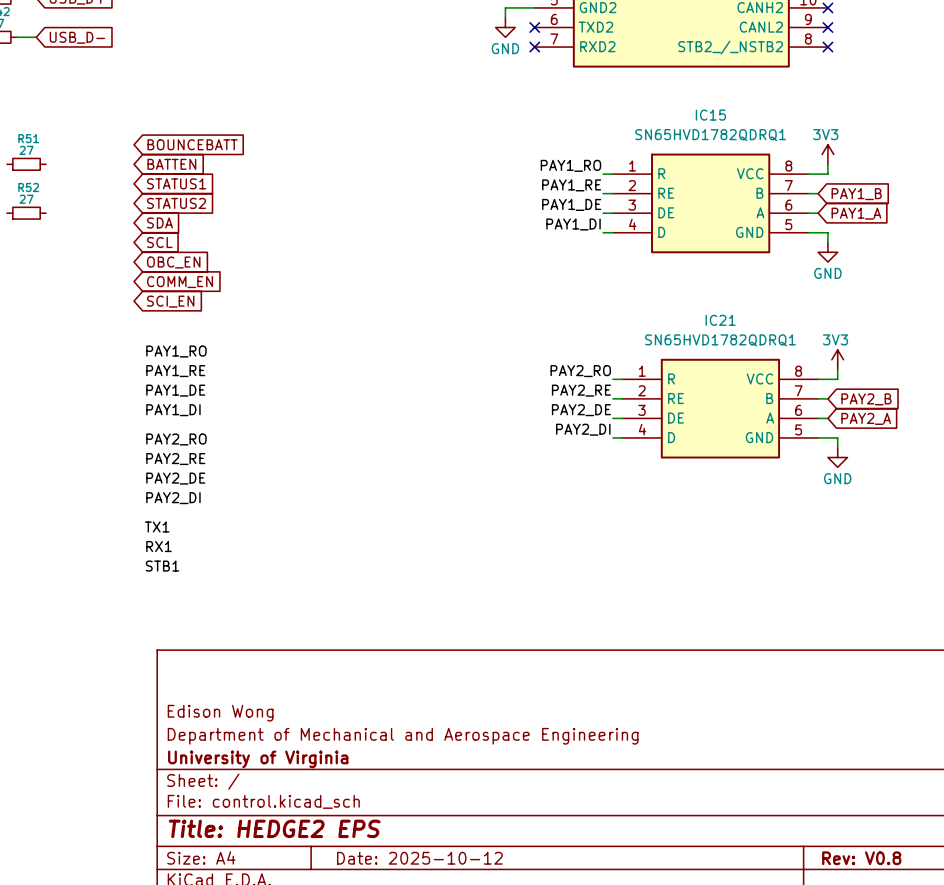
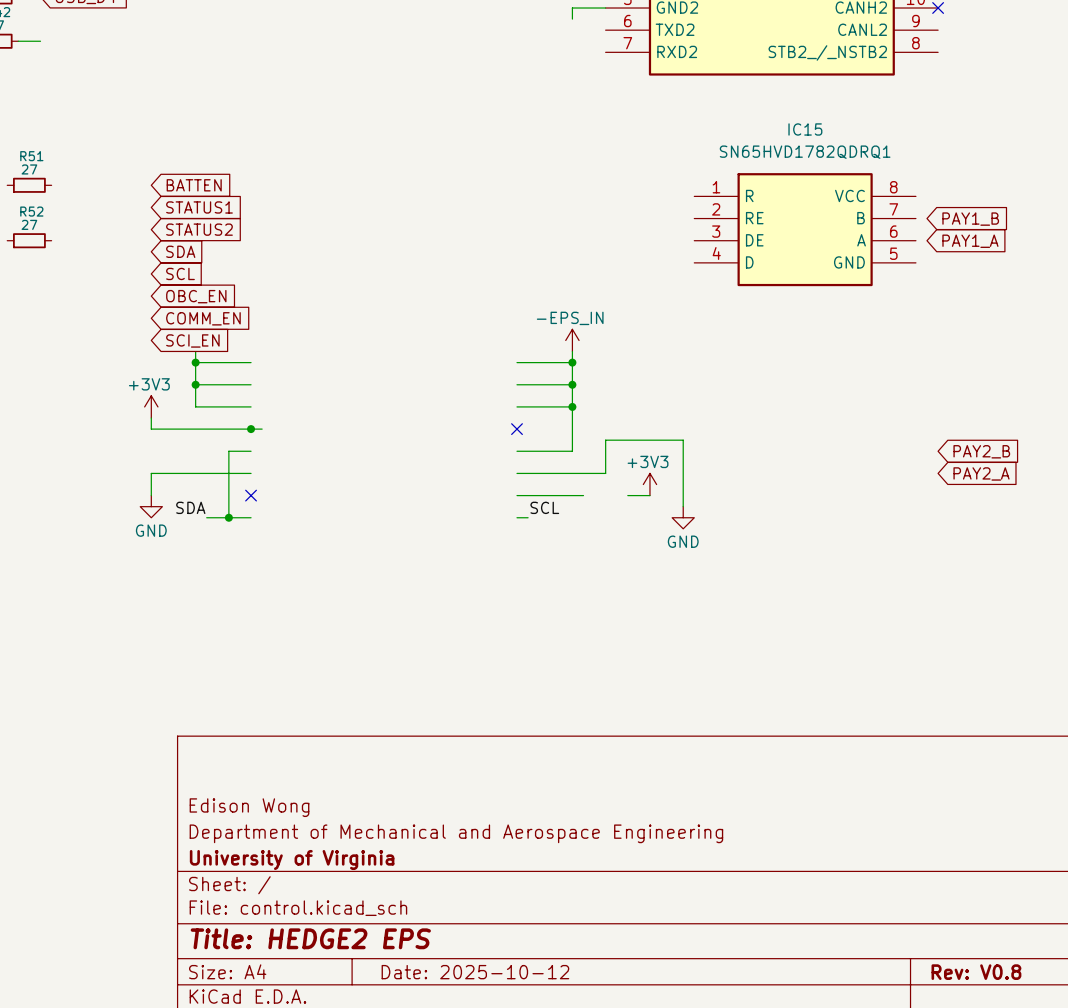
power symbol: GND (505, 27) -> none
no-connect mark: (534, 27) -> none
no-connect mark: (827, 27) -> none
global label: USB_D- (77, 37) -> none
no-connect mark: (534, 47) -> none
no-connect mark: (827, 47) -> none
global label: BOUNCEBATT (192, 144) -> none
power symbol: 3V3 (827, 154) -> none
wire: (827, 164) (827, 174) (808, 174) -> none
label: PAY1_RO (570, 165) -> none
wire: (603, 174) (612, 174) -> none
label: PAY1_RE (571, 185) -> none
wire: (603, 193) (612, 193) -> none
wire: (808, 193) (818, 193) -> none
label: PAY1_DE (571, 204) -> none
wire: (603, 213) (612, 213) -> none
wire: (808, 213) (818, 213) -> none
label: PAY1_DI (573, 224) -> none
wire: (603, 232) (612, 232) -> none
wire: (808, 232) (827, 232) (827, 242) -> none
power symbol: GND (827, 252) -> none
power symbol: none -> -EPS_IN (572, 340)
wire: none -> (195, 351) (195, 406) (251, 406)
wire: none -> (572, 351) (572, 451) (517, 451)
wire: none -> (195, 362) (251, 362)
junction: none -> (195, 362)
wire: none -> (517, 362) (572, 362)
junction: none -> (572, 362)
wire: none -> (195, 384) (251, 384)
junction: none -> (195, 384)
wire: none -> (517, 384) (572, 384)
junction: none -> (572, 384)
label: PAY1_RO (176, 351) -> none
power symbol: none -> +3V3 (151, 406)
wire: none -> (517, 406) (572, 406)
junction: none -> (572, 406)
power symbol: 3V3 (837, 359) -> none
wire: none -> (151, 418) (151, 429) (262, 429)
wire: (837, 369) (837, 379) (818, 379) -> none
label: PAY1_RE (175, 371) -> none
label: PAY2_RO (580, 371) -> none
junction: none -> (251, 429)
no-connect mark: none -> (517, 429)
wire: (612, 379) (622, 379) -> none
label: PAY1_DE (175, 390) -> none
label: PAY2_RE (581, 390) -> none
wire: none -> (251, 451) (228, 451) (228, 517)
wire: (612, 398) (622, 398) -> none
wire: (818, 398) (827, 398) -> none
IC21: SN65HVD1782QDRQ1 (720, 408) -> none
label: PAY1_DI (173, 410) -> none
label: PAY2_DE (581, 410) -> none
wire: none -> (251, 473) (151, 473) (151, 495)
wire: none -> (517, 473) (605, 473) (605, 440) (683, 440) (683, 506)
wire: (612, 418) (622, 418) -> none
wire: (818, 418) (827, 418) -> none
power symbol: none -> +3V3 (649, 484)
label: PAY2_DI (583, 429) -> none
no-connect mark: none -> (251, 495)
wire: none -> (517, 495) (583, 495)
wire: none -> (627, 495) (649, 495)
wire: (612, 437) (622, 437) -> (517, 517) (528, 517)
wire: (818, 437) (837, 437) (837, 447) -> none
label: PAY2_RO (176, 439) -> none
power symbol: none -> GND (151, 506)
label: none -> SDA (190, 507)
label: none -> SCL (544, 507)
wire: none -> (206, 517) (251, 517)
junction: none -> (228, 517)
power symbol: none -> GND (683, 517)
power symbol: GND (837, 457) -> none
label: PAY2_RE (175, 459) -> none
label: PAY2_DE (175, 478) -> none
label: PAY2_DI (173, 498) -> none
label: TX1 (157, 526) -> none
label: RX1 (159, 546) -> none
label: STB1 (162, 566) -> none

